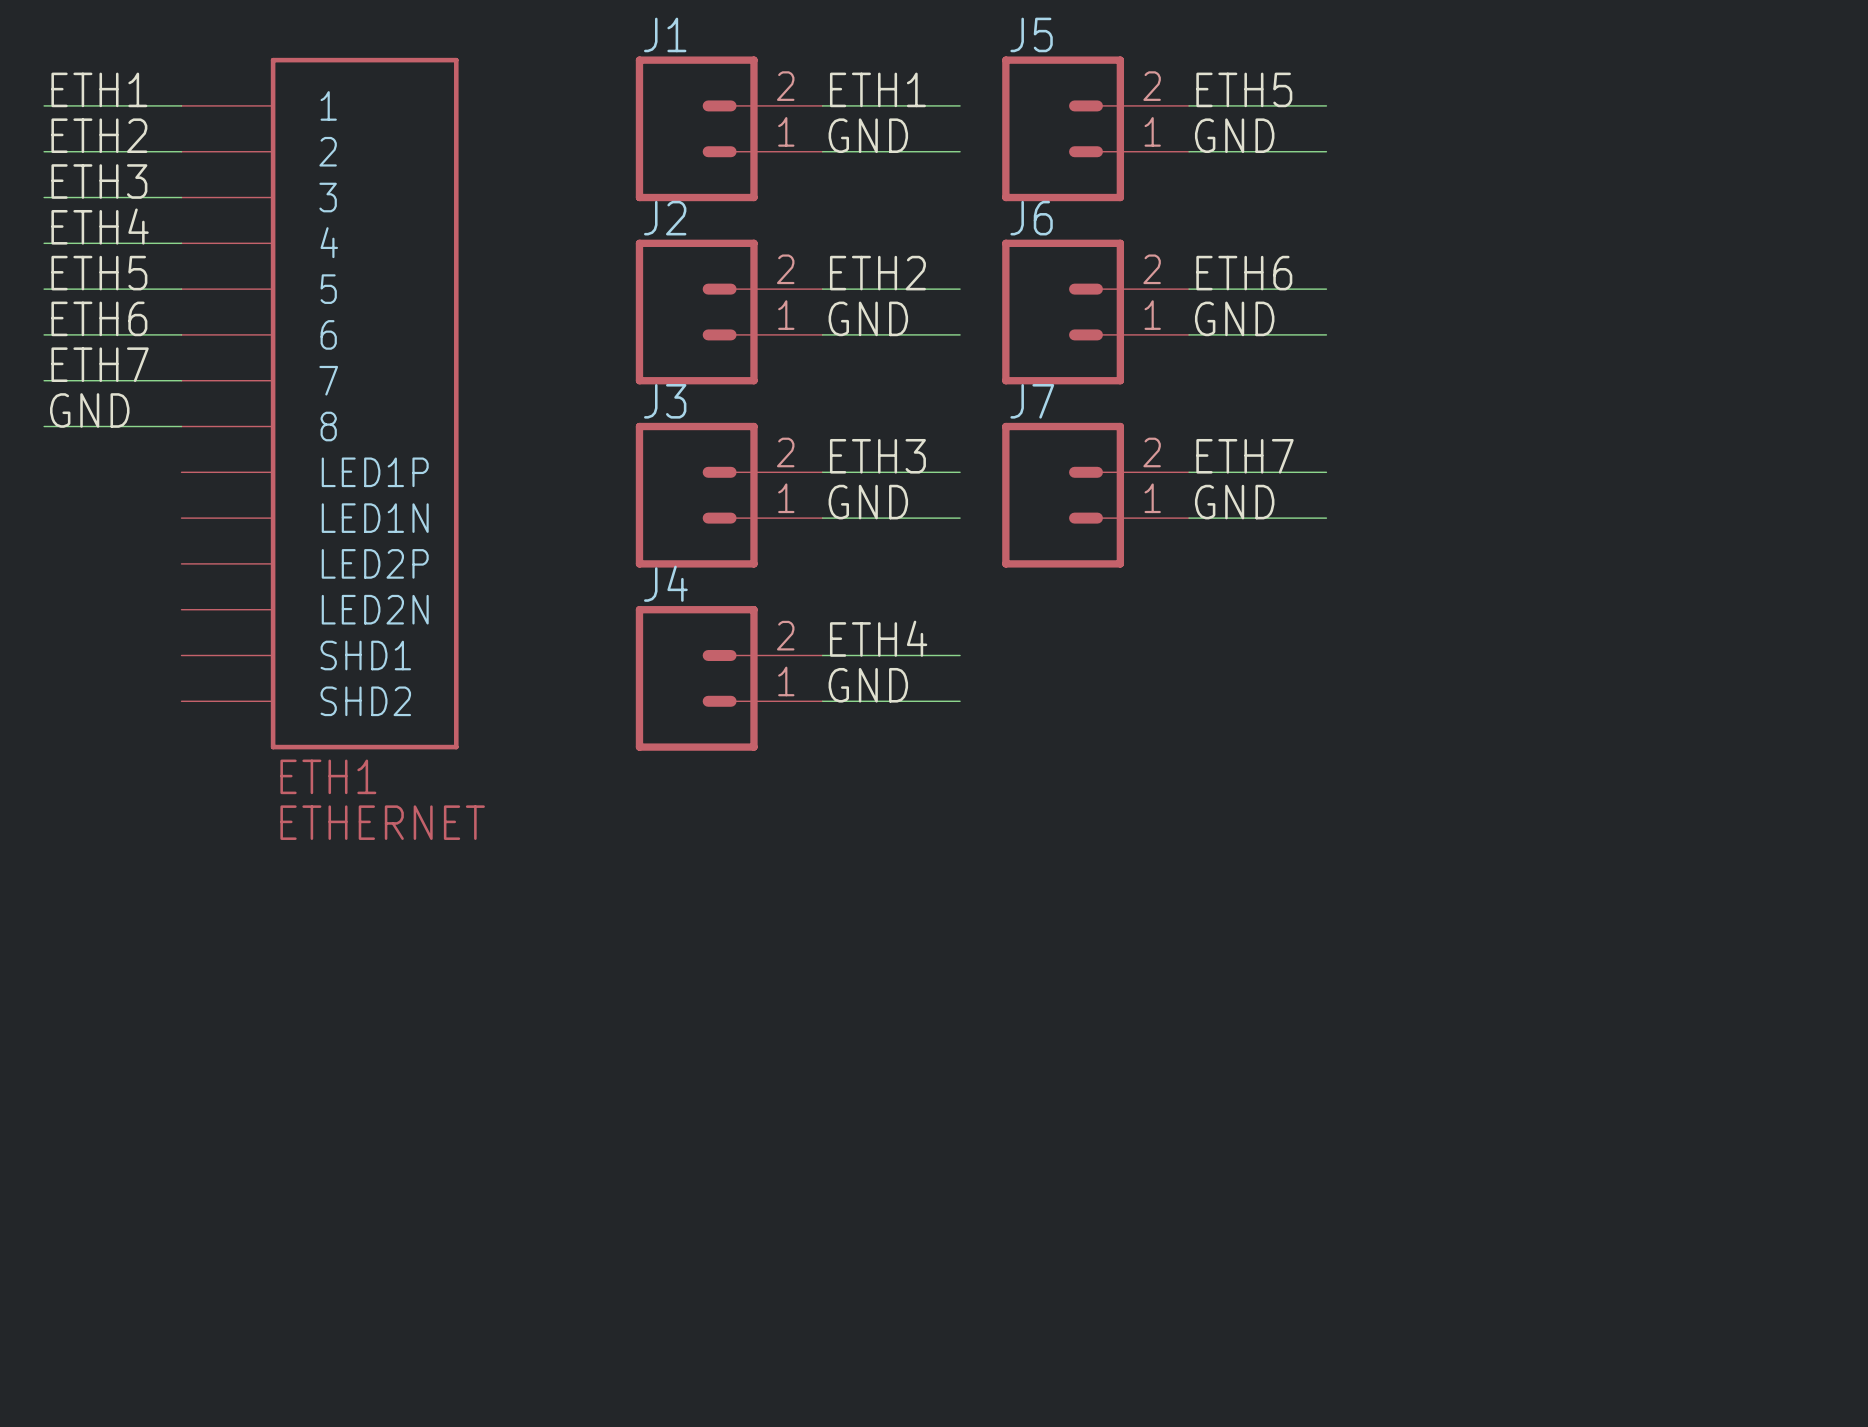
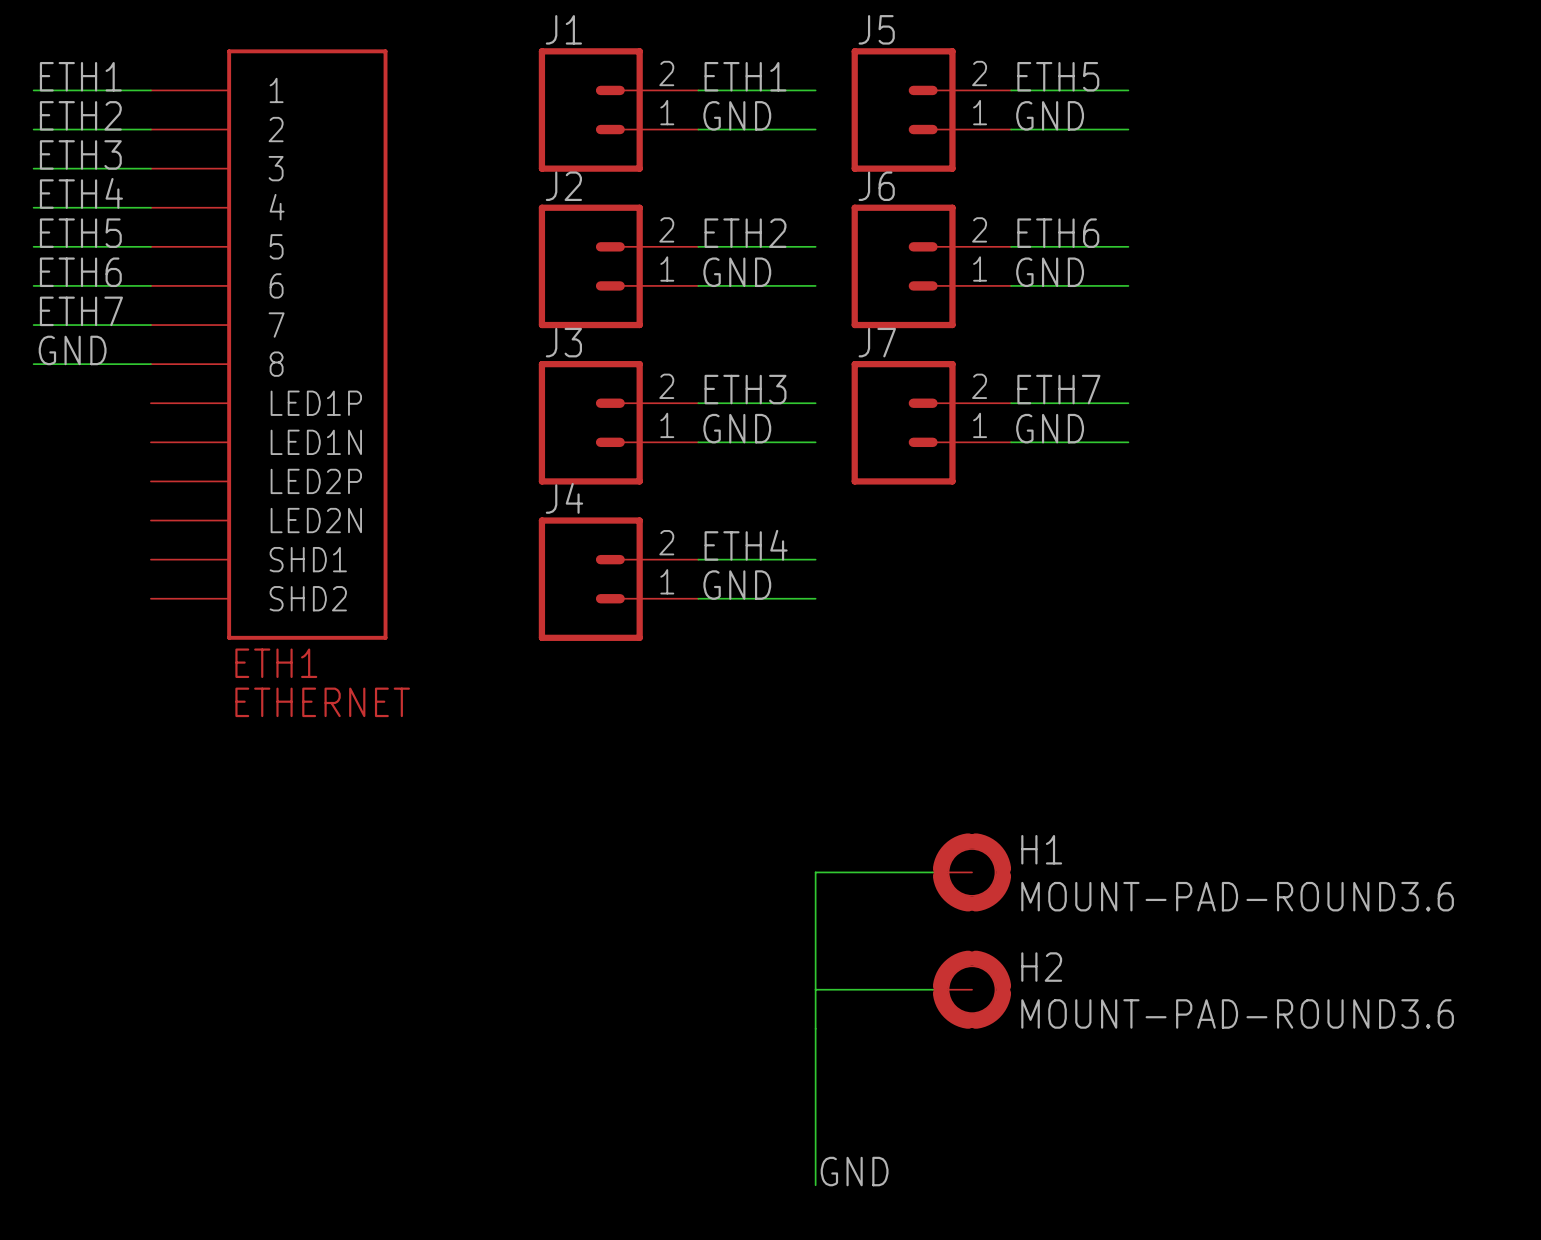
wire: none -> (932, 872) (815, 872) (815, 1185)
H1: none -> MOUNT-PAD-ROUND3.6 (972, 872)
wire: none -> (815, 989) (932, 989)
H2: none -> MOUNT-PAD-ROUND3.6 (972, 989)
label: none -> GND (854, 1171)

